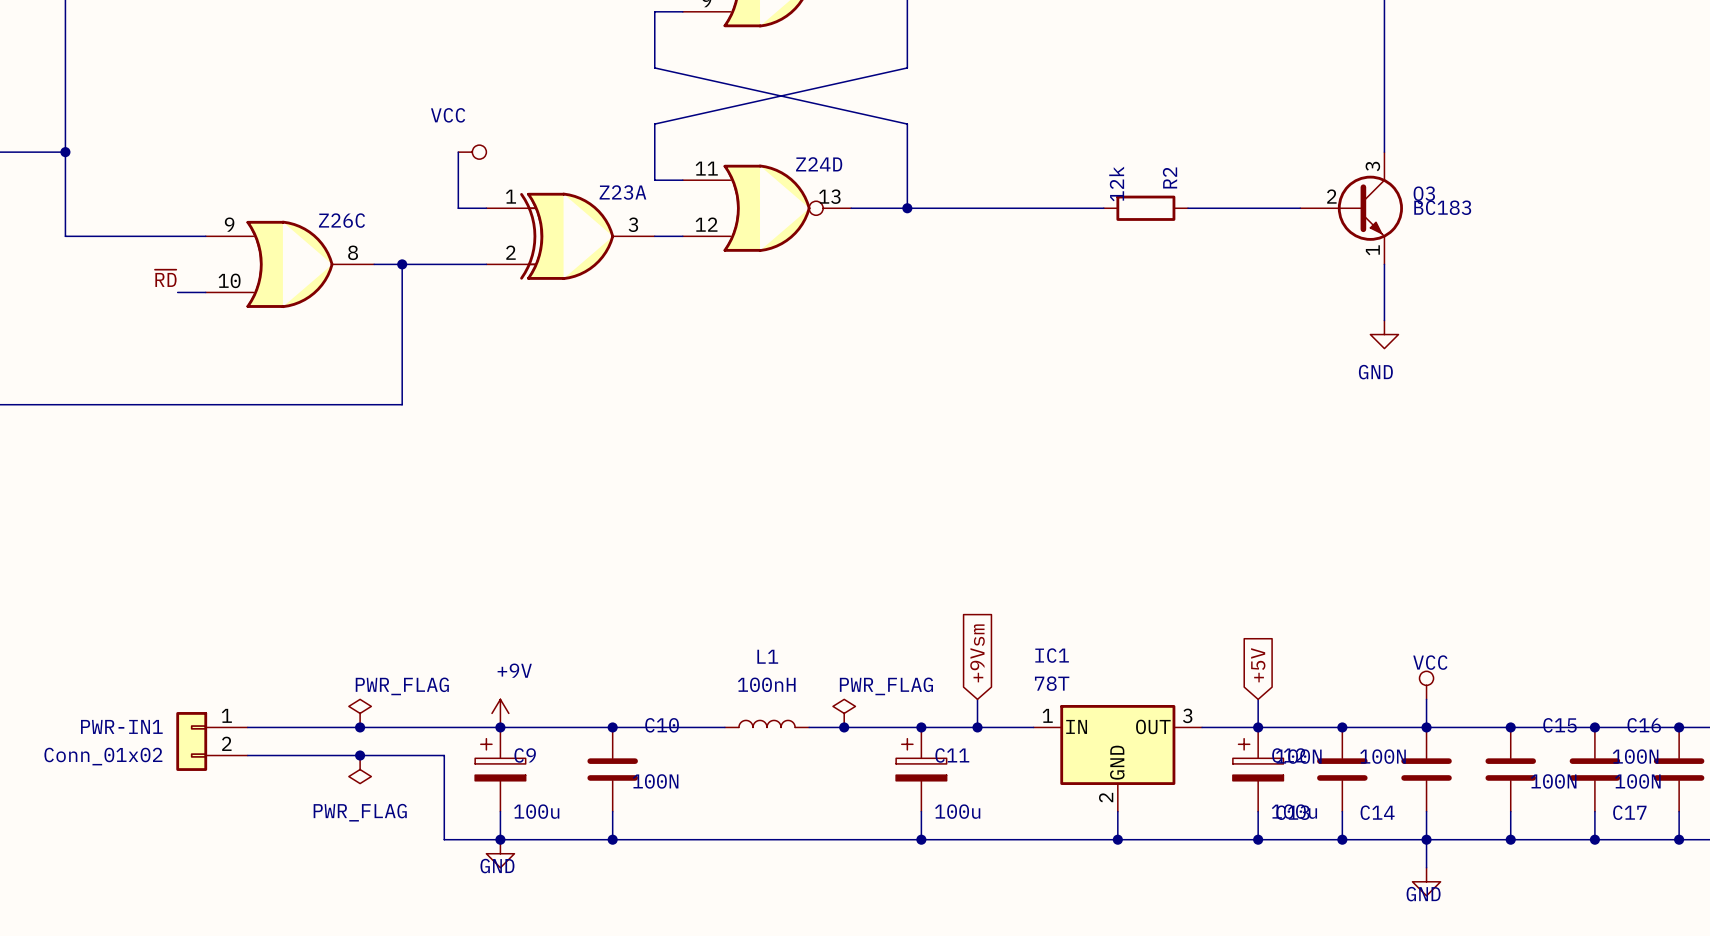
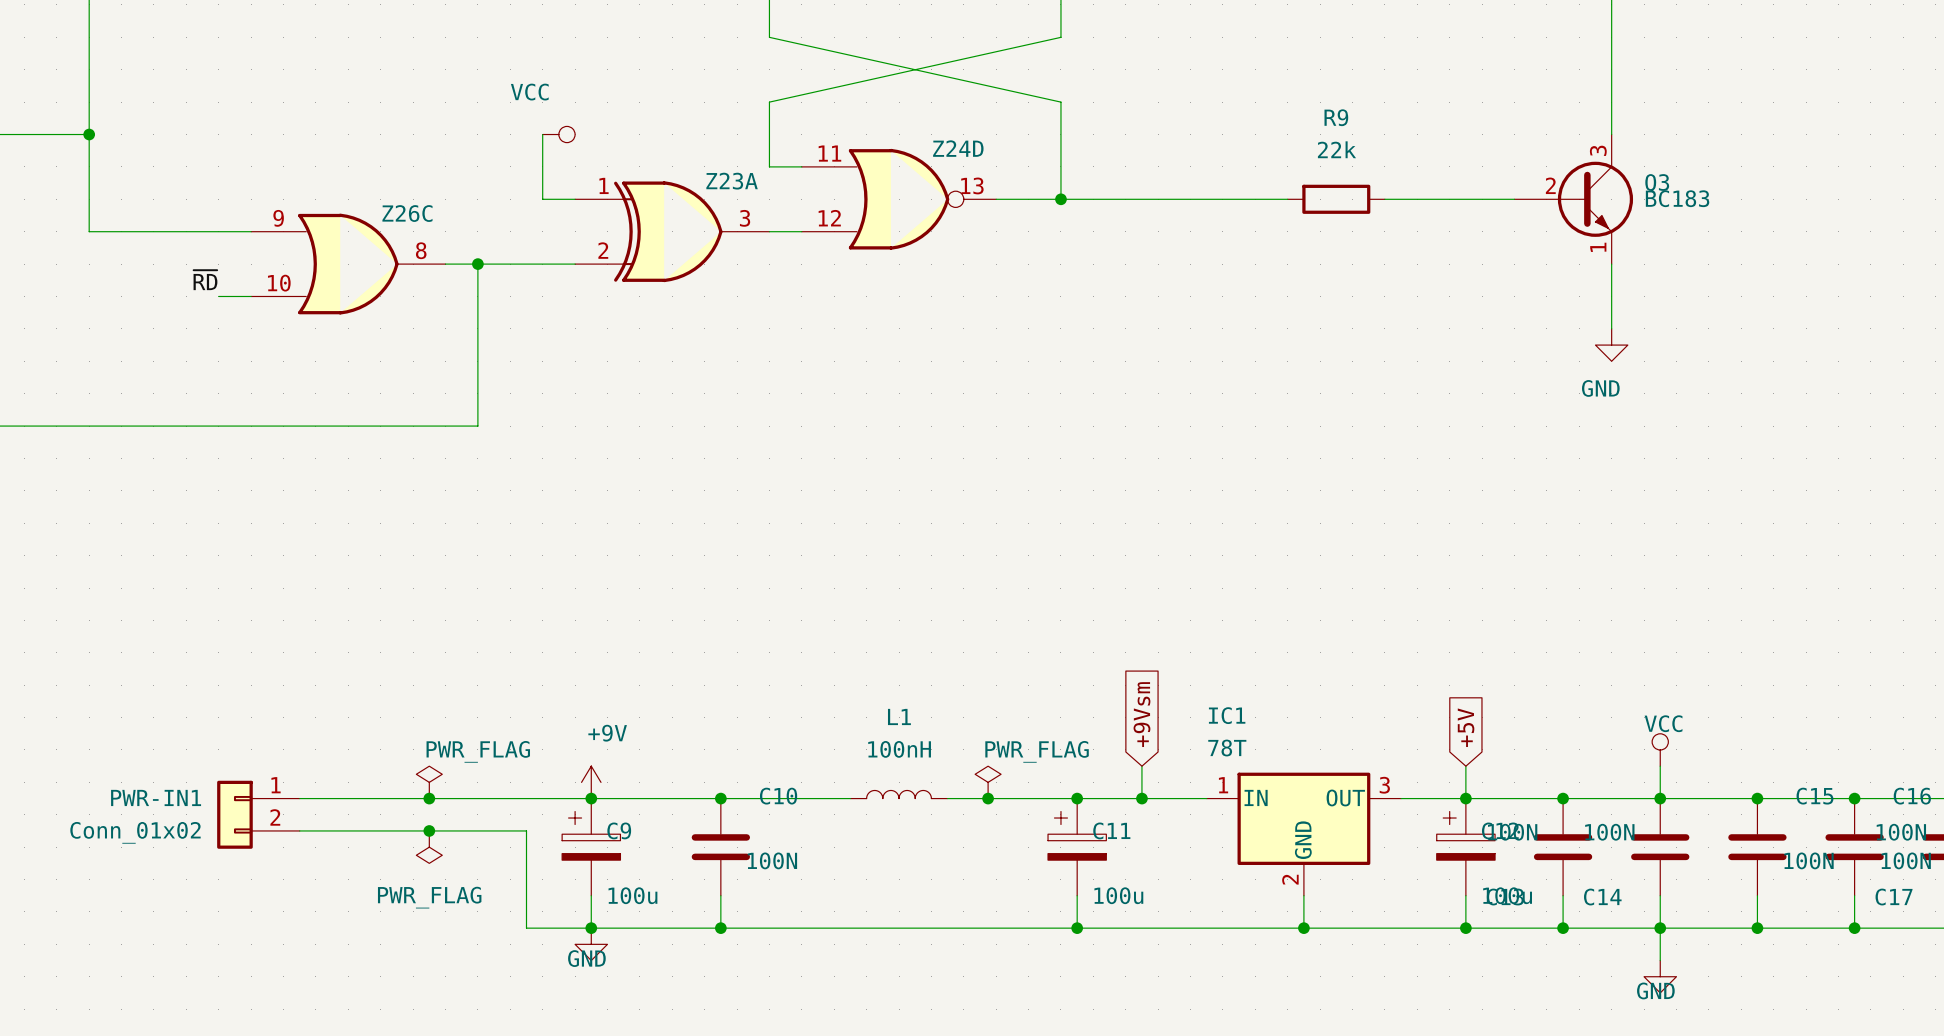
R2 name: R2 (1170, 177) -> R9 (1336, 117)
R2 value: 12k (1116, 183) -> 22k (1336, 149)

